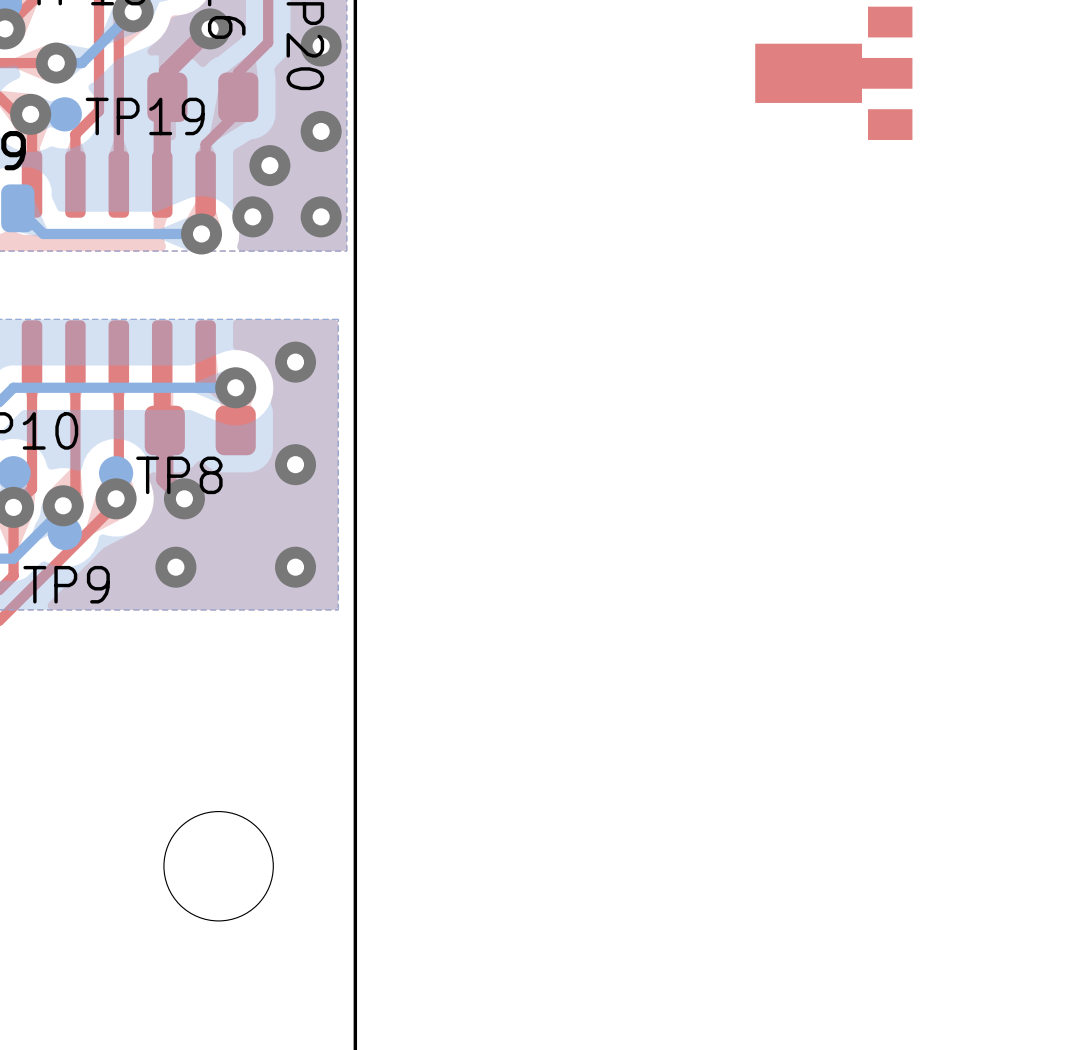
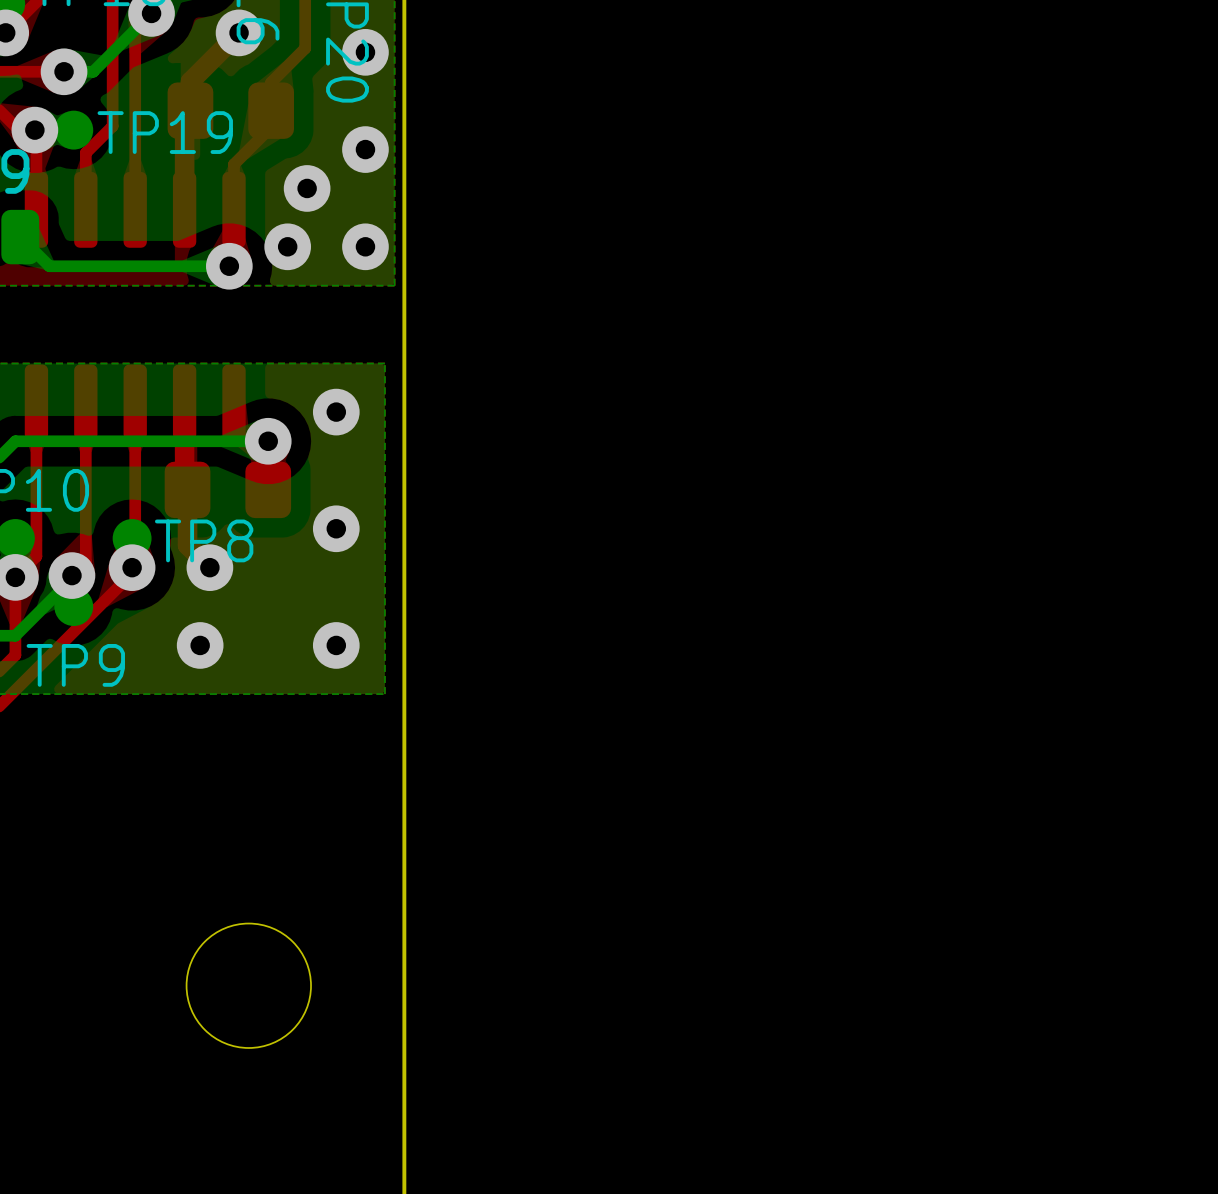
part: (833, 73) -> none

